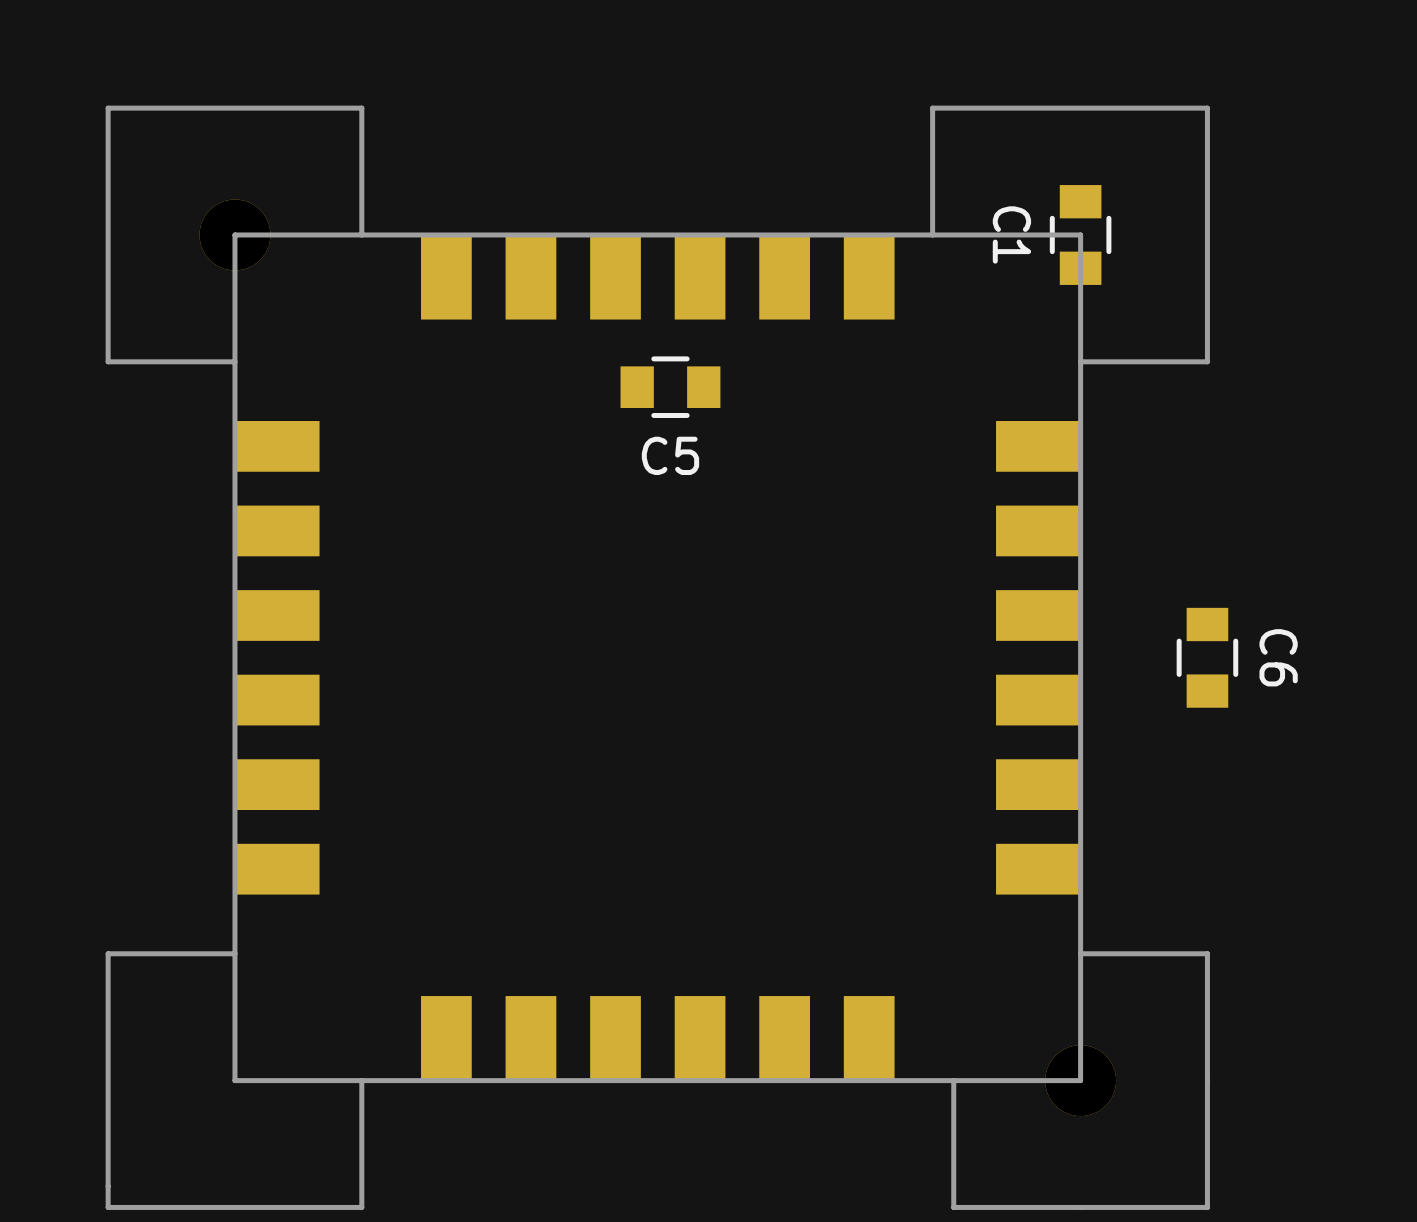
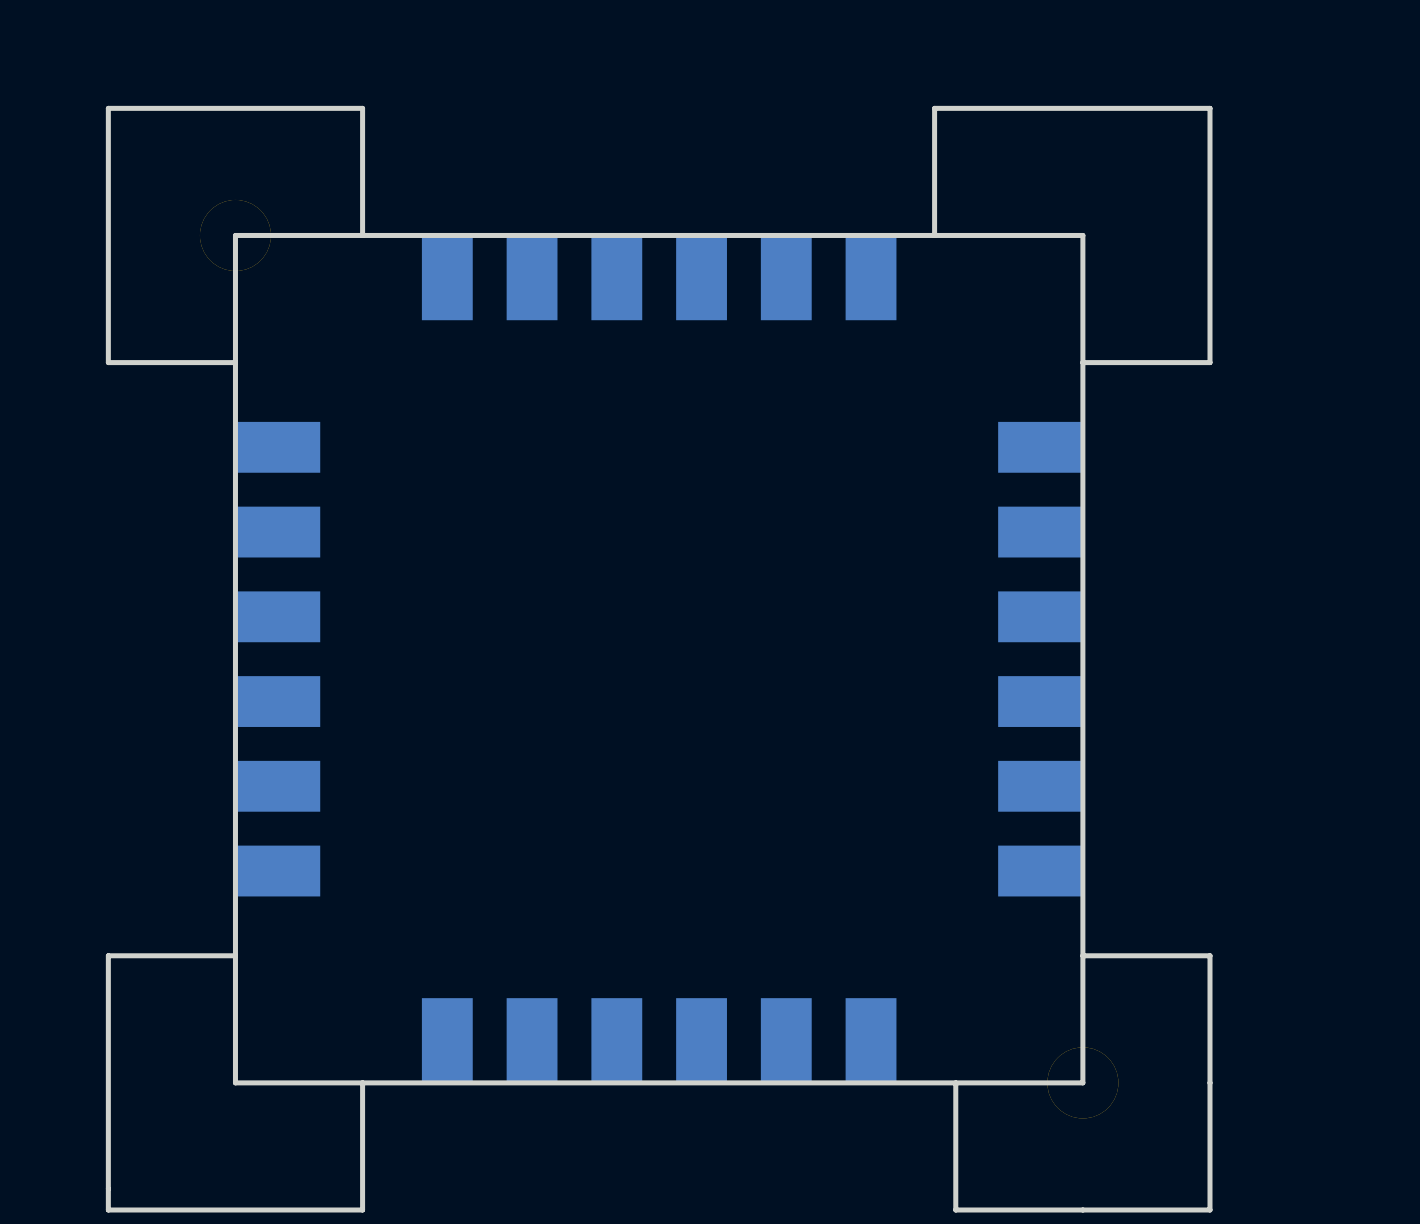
C1: (1080, 234) -> none
C5: (670, 387) -> none
C6: (1207, 657) -> none

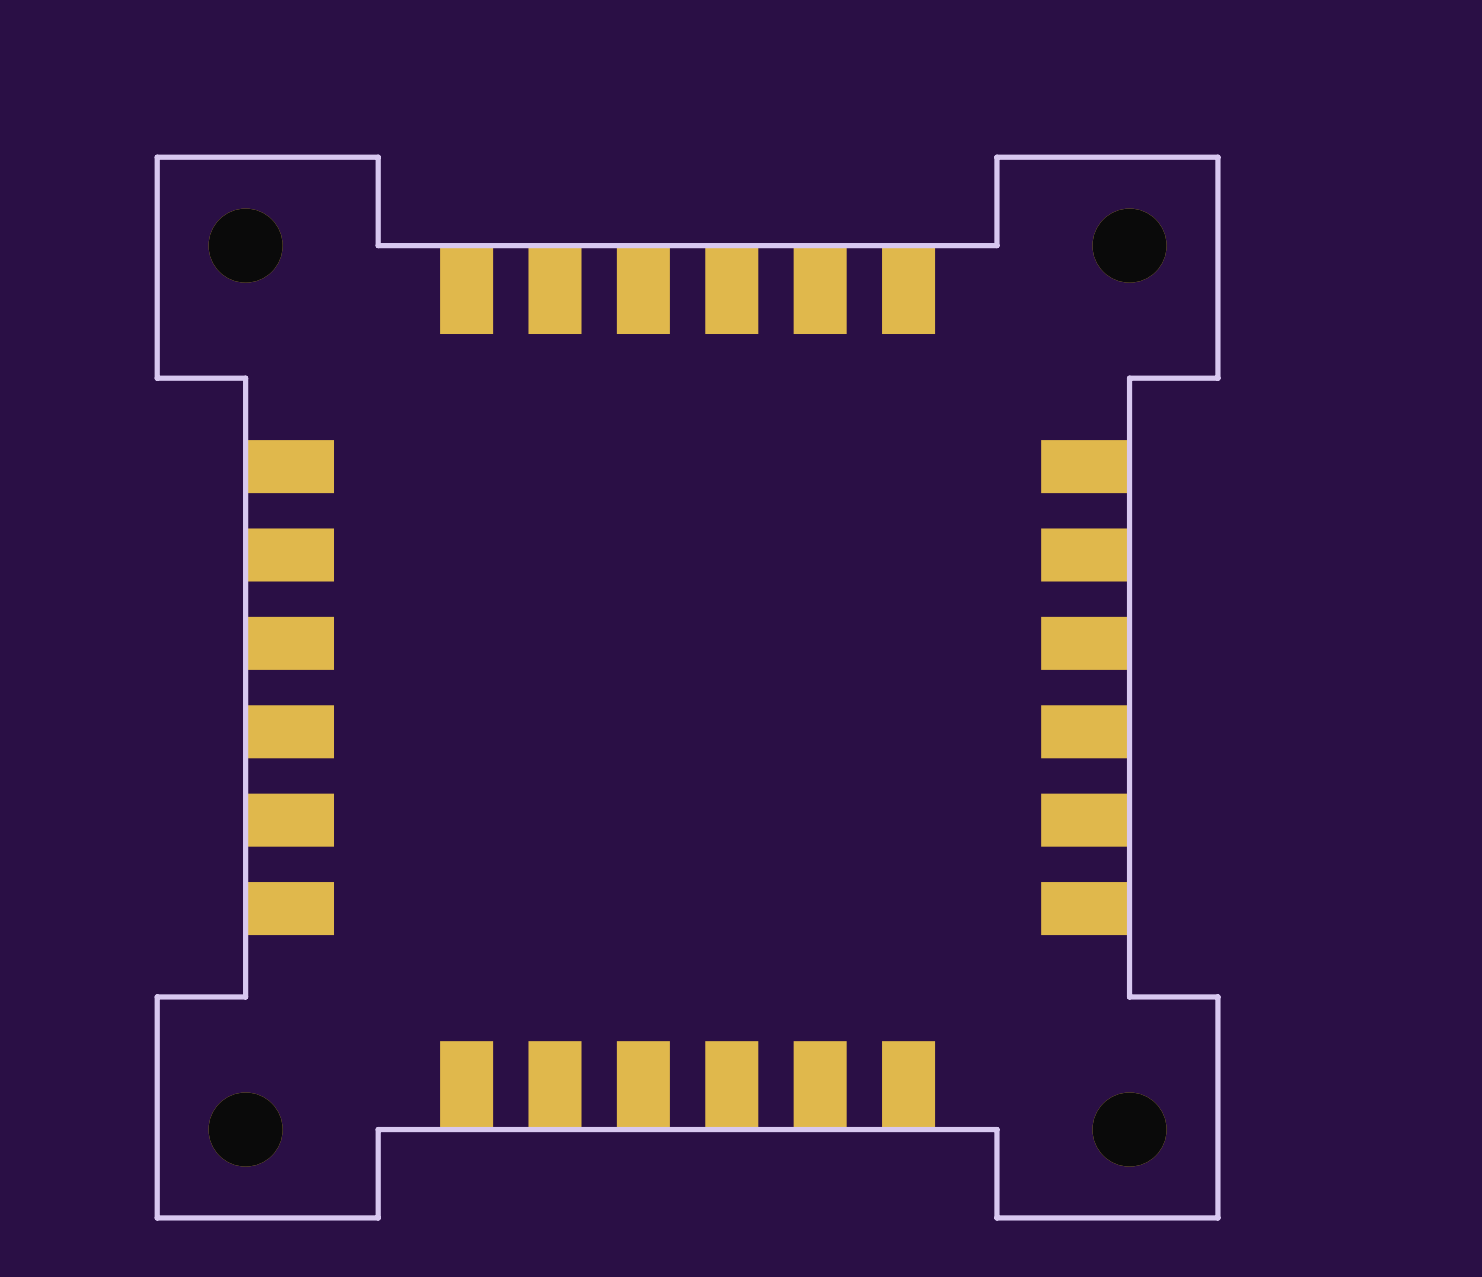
board edge: (362, 150) (362, 108) (108, 108) (108, 362) (150, 362) -> (378, 157) (157, 157) (157, 378)
board edge: (362, 235) (235, 235) (235, 362) -> none
board edge: (934, 235) (934, 108) (1210, 108) (1210, 362) (1167, 362) -> (996, 245) (996, 157) (1217, 157) (1217, 378)
board edge: (955, 235) (1082, 235) (1082, 362) -> none
part: none -> (1129, 245)
board edge: (150, 955) (108, 955) (108, 1210) (362, 1210) (362, 1167) -> (157, 996) (157, 1217) (378, 1217)
board edge: (235, 955) (235, 1082) (362, 1082) -> none
board edge: (1082, 955) (1082, 1082) (955, 1082) -> none
board edge: (1167, 955) (1210, 955) (1210, 1210) (955, 1210) (955, 1167) -> (1217, 996) (1217, 1217) (996, 1217)
part: none -> (245, 1129)

